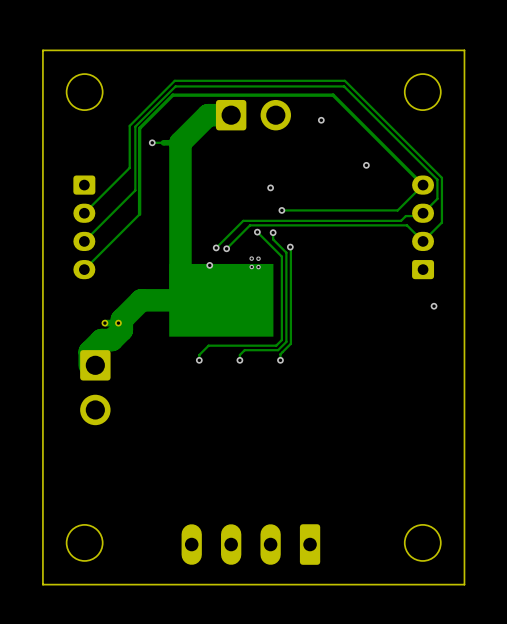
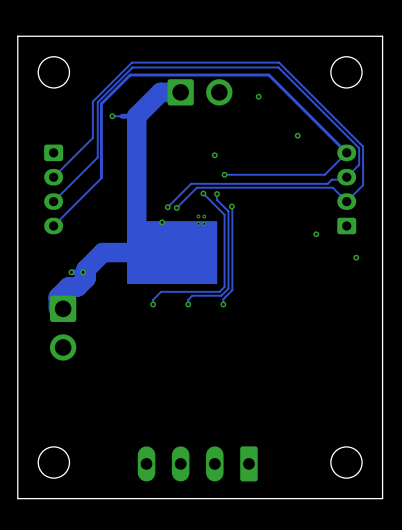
via: none -> (316, 234)

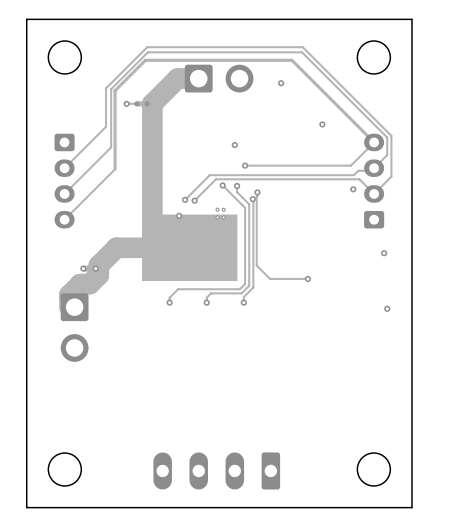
via: none -> (353, 189)
track: none -> (257, 192) (256, 265) (270, 278) (307, 278)
via: none -> (257, 192)
via: (316, 234) -> none
via: none -> (307, 278)
via: none -> (387, 308)

